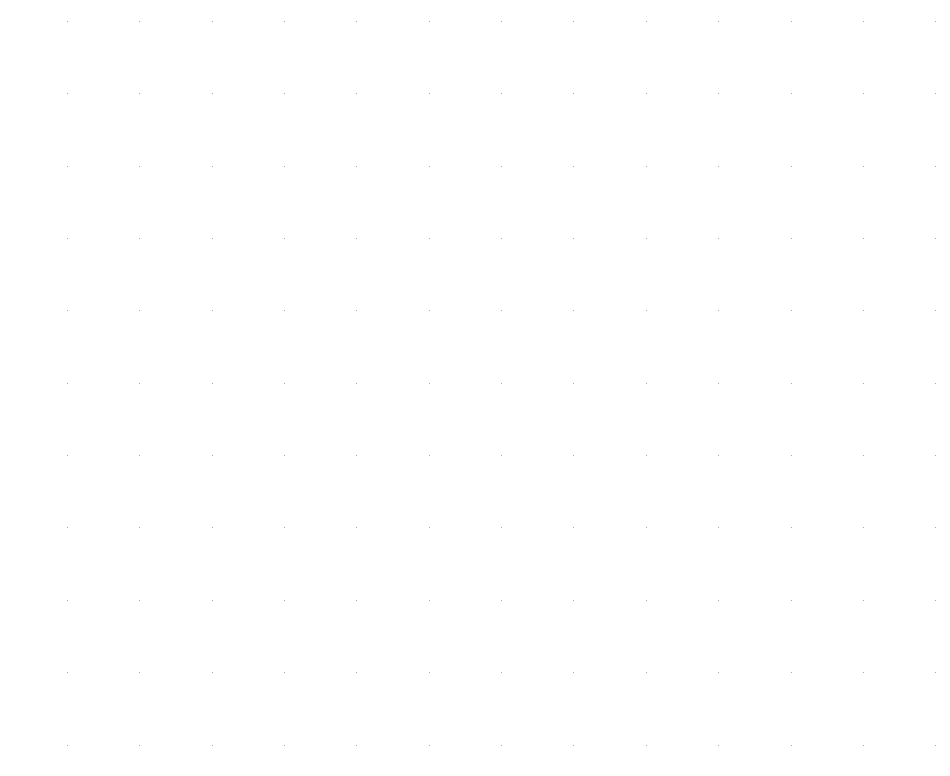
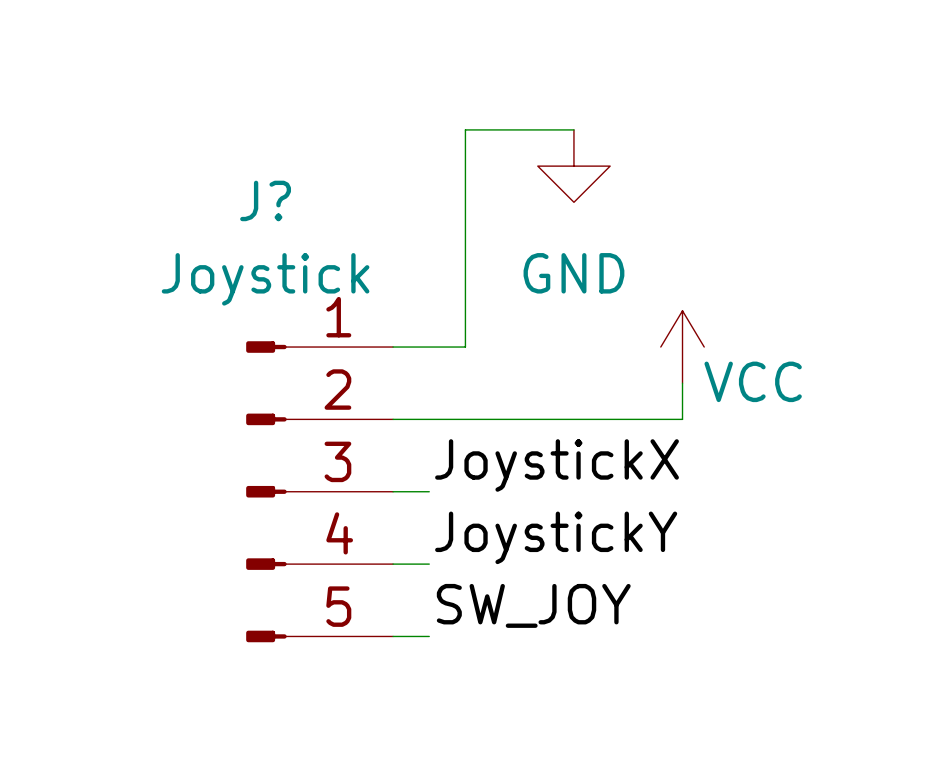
wire: none -> (573, 129) (465, 129) (465, 347) (393, 347)
power symbol: none -> GND (573, 166)
power symbol: none -> VCC (682, 347)
wire: none -> (682, 383) (682, 419) (393, 419)
label: none -> JoystickX (557, 465)
J?: none -> Joystick (319, 491)
wire: none -> (393, 491) (429, 491)
label: none -> JoystickY (556, 537)
wire: none -> (393, 564) (429, 564)
label: none -> SW_JOY (533, 605)
wire: none -> (393, 636) (429, 636)

